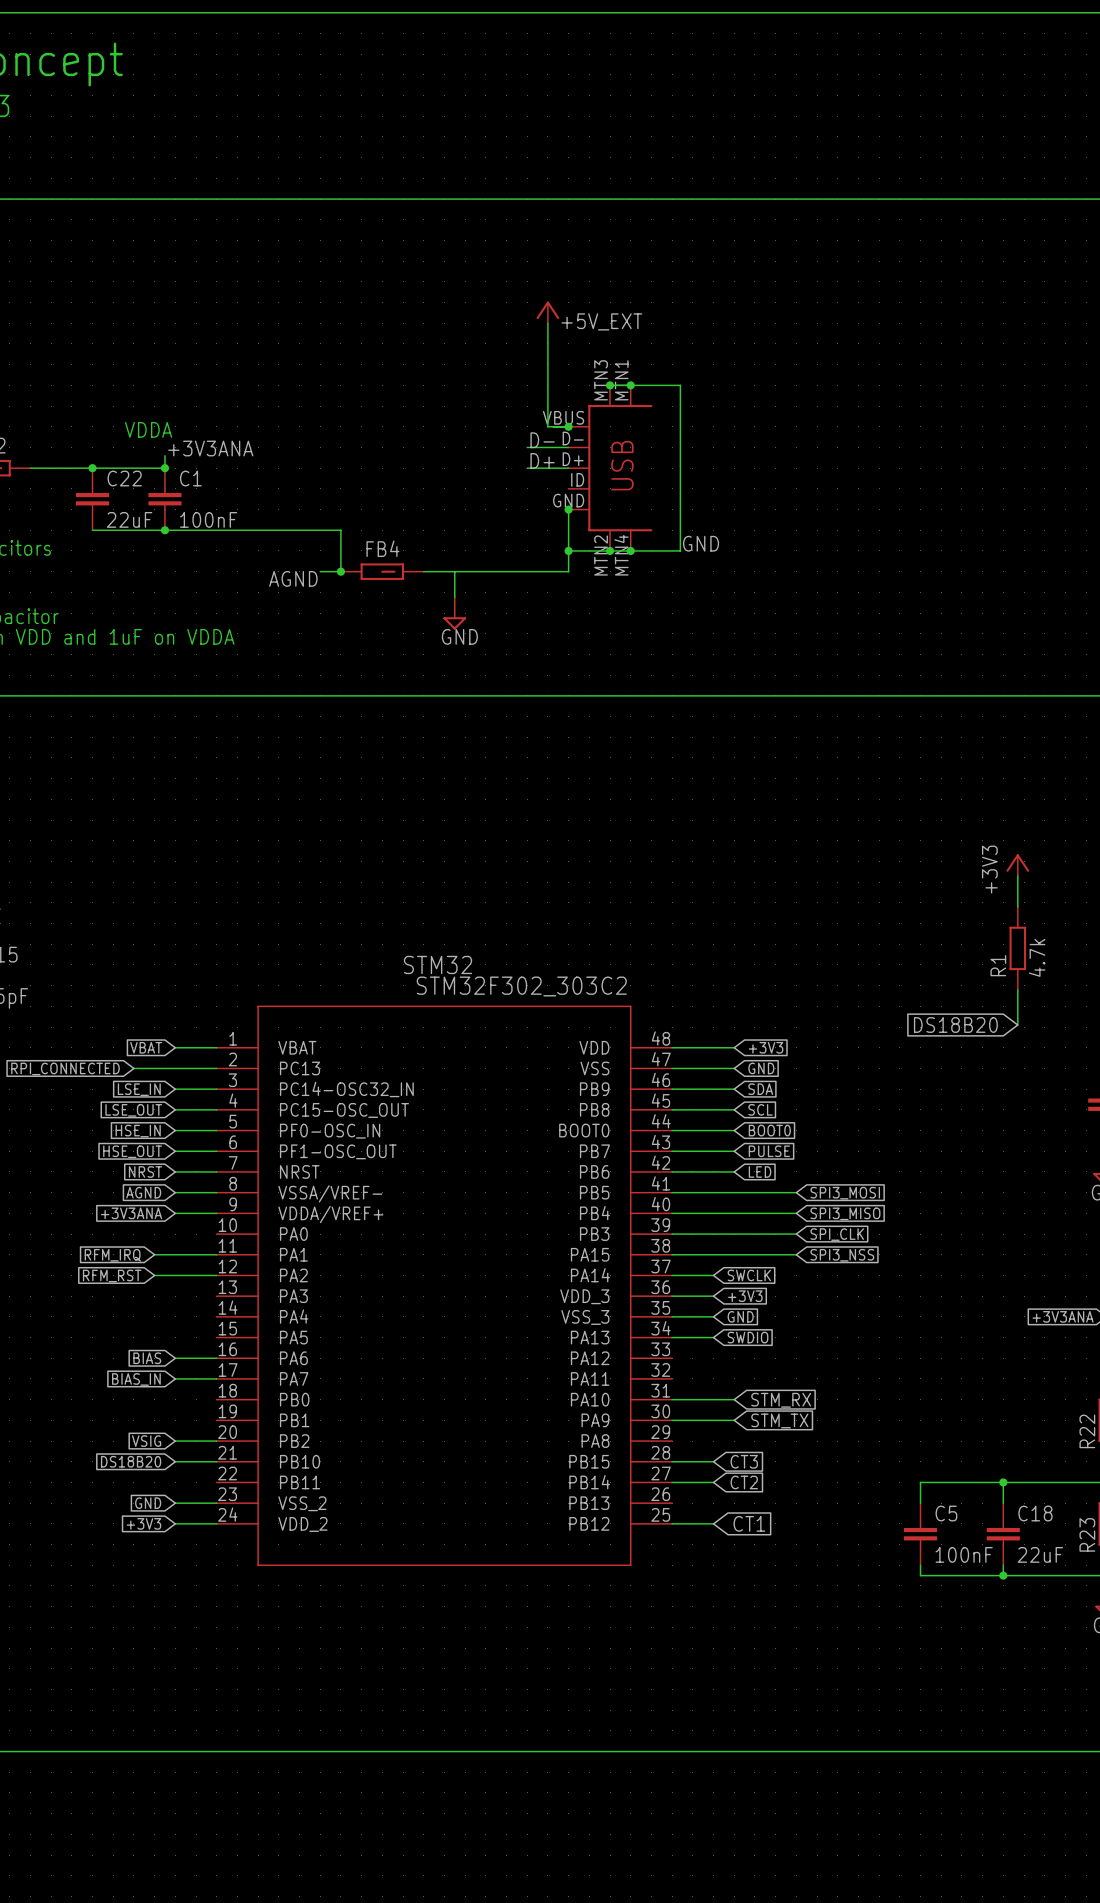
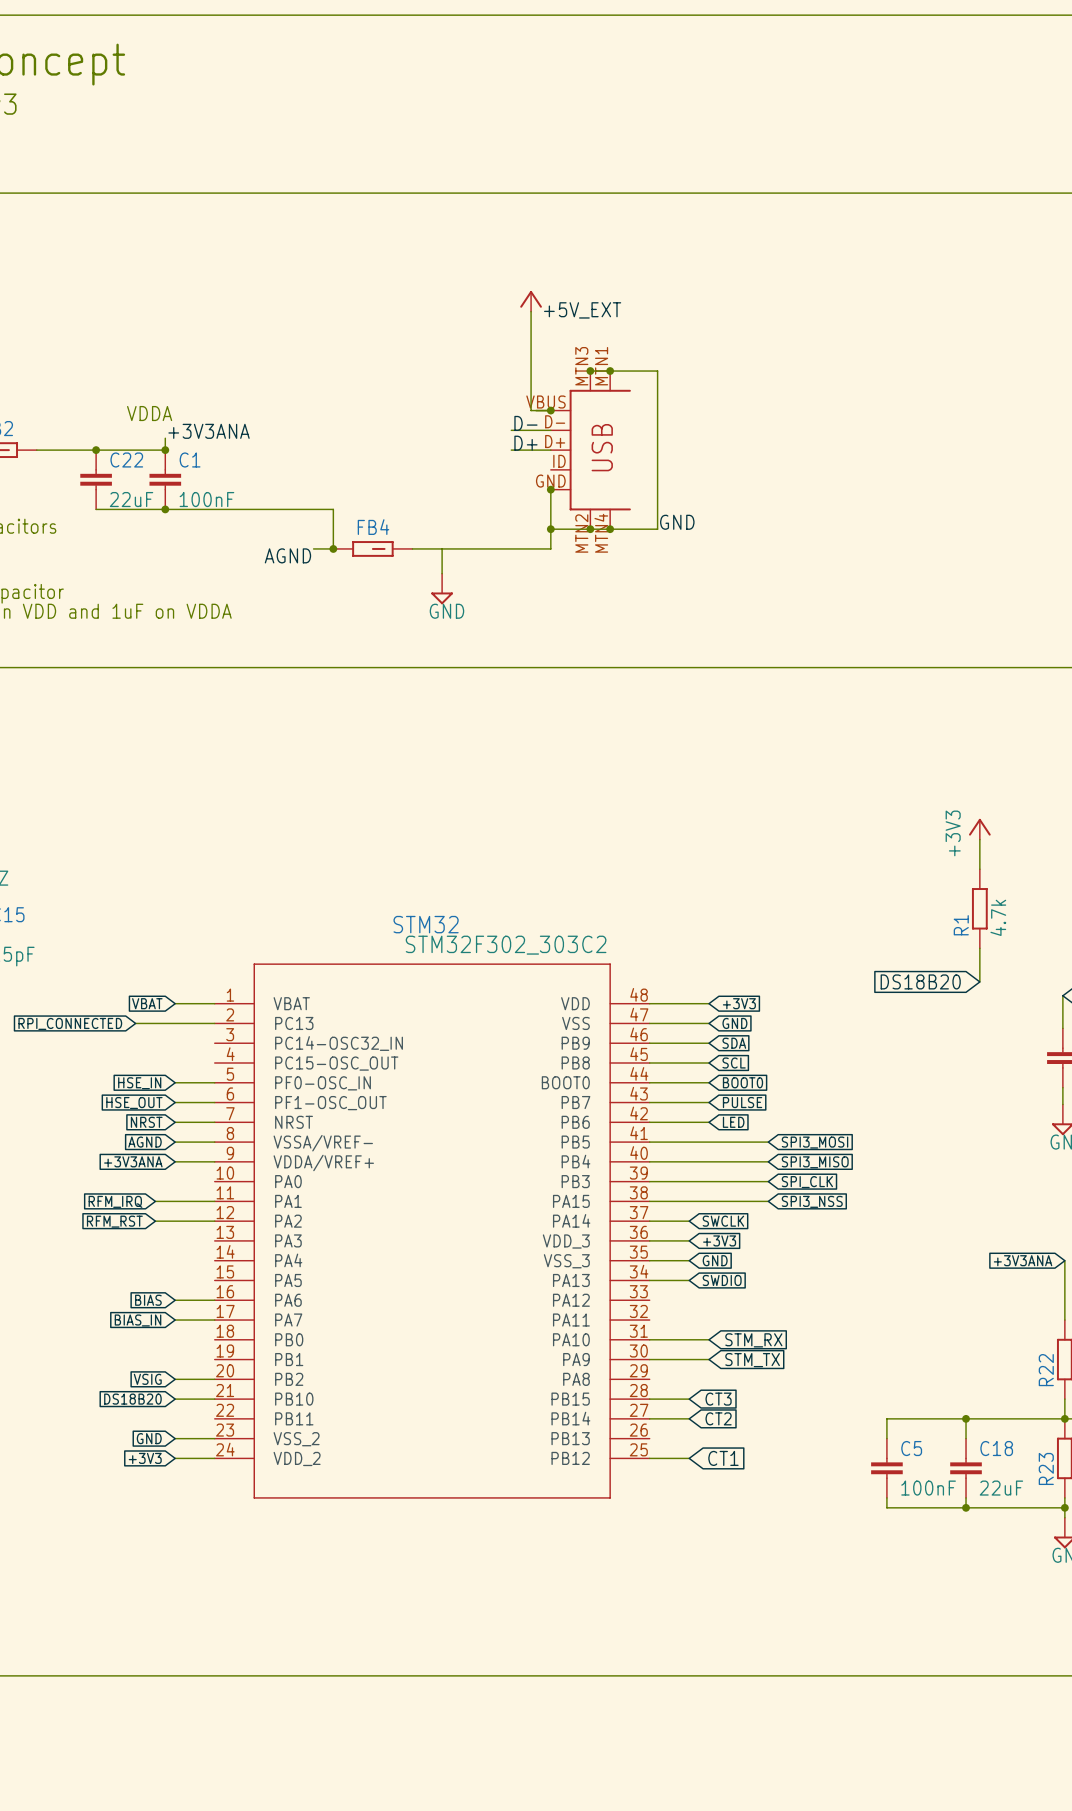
global label: LSE_IN (139, 1089) -> none
wire: (175, 1089) (216, 1089) -> none
wire: (175, 1109) (216, 1109) -> none
global label: LSE_OUT (133, 1110) -> none

